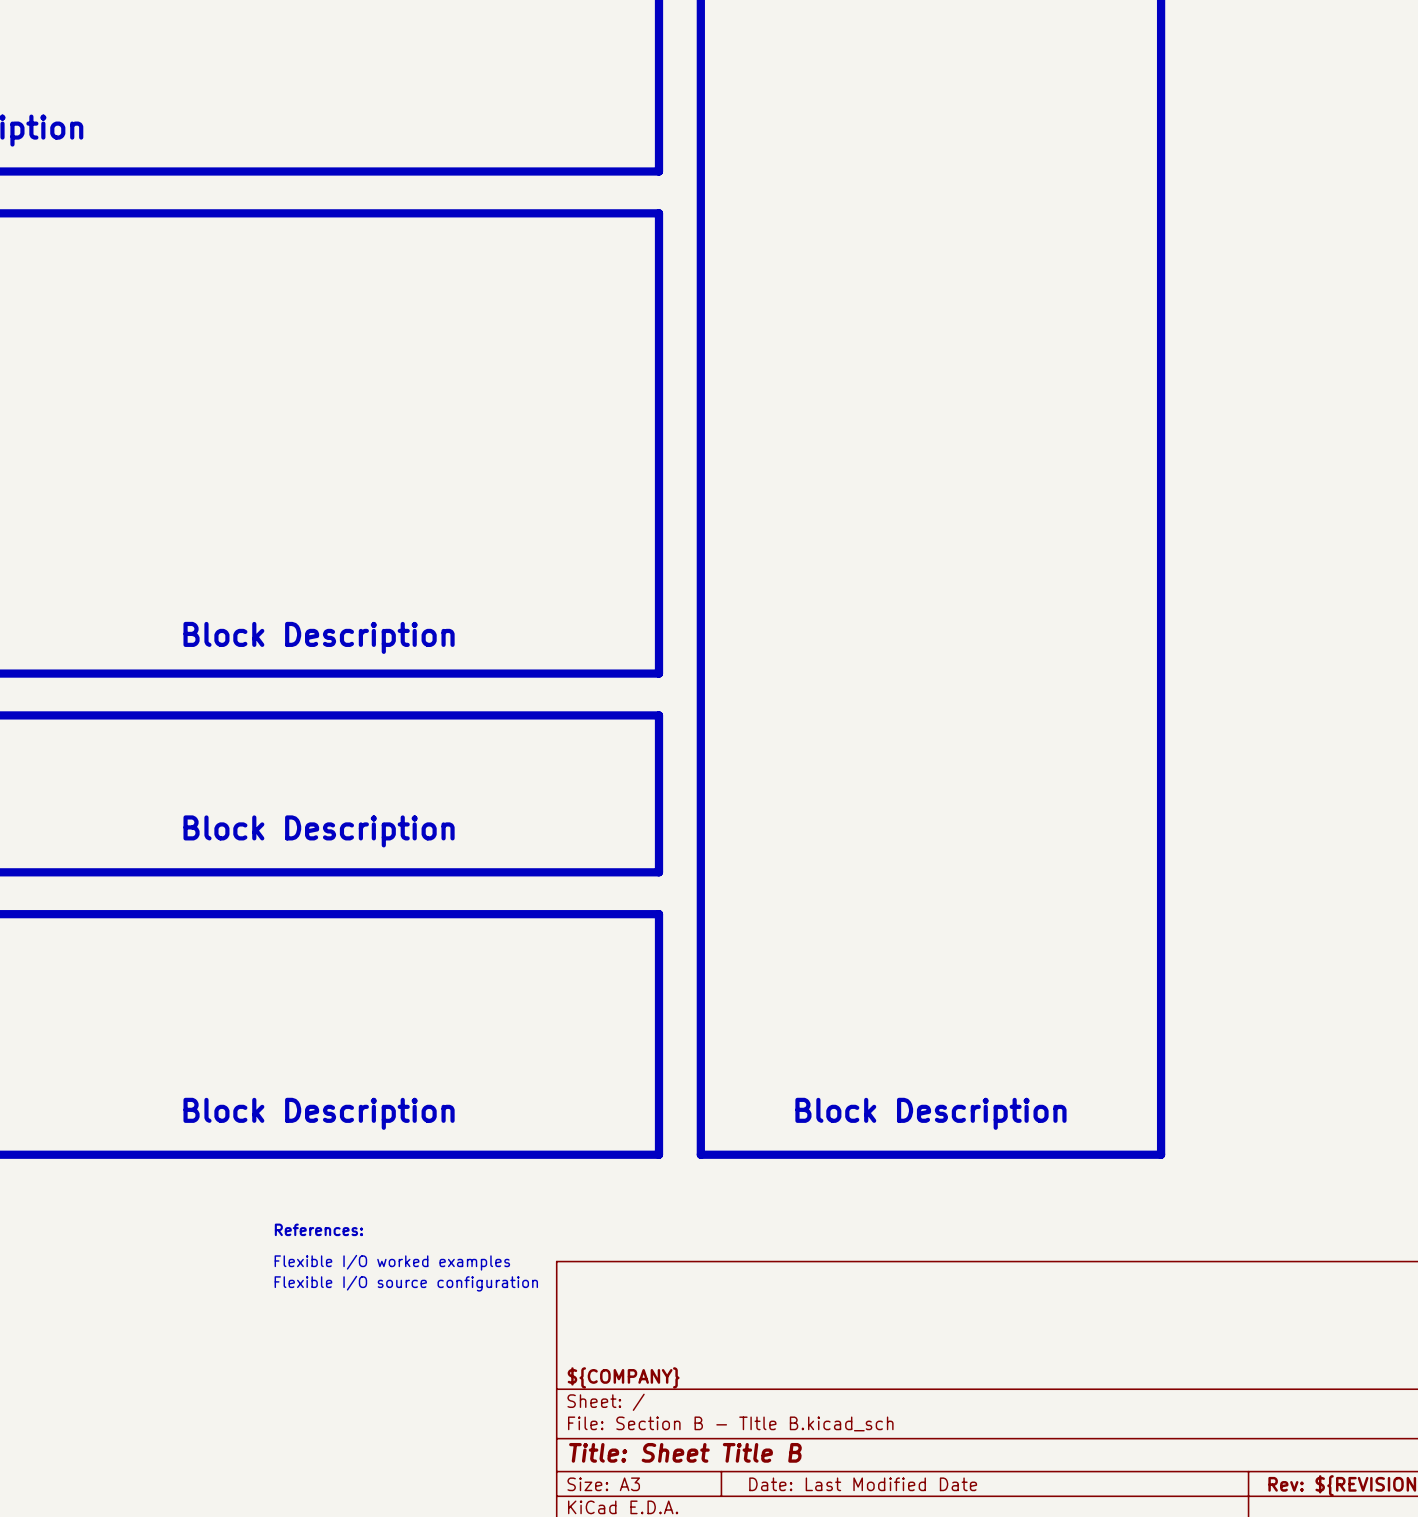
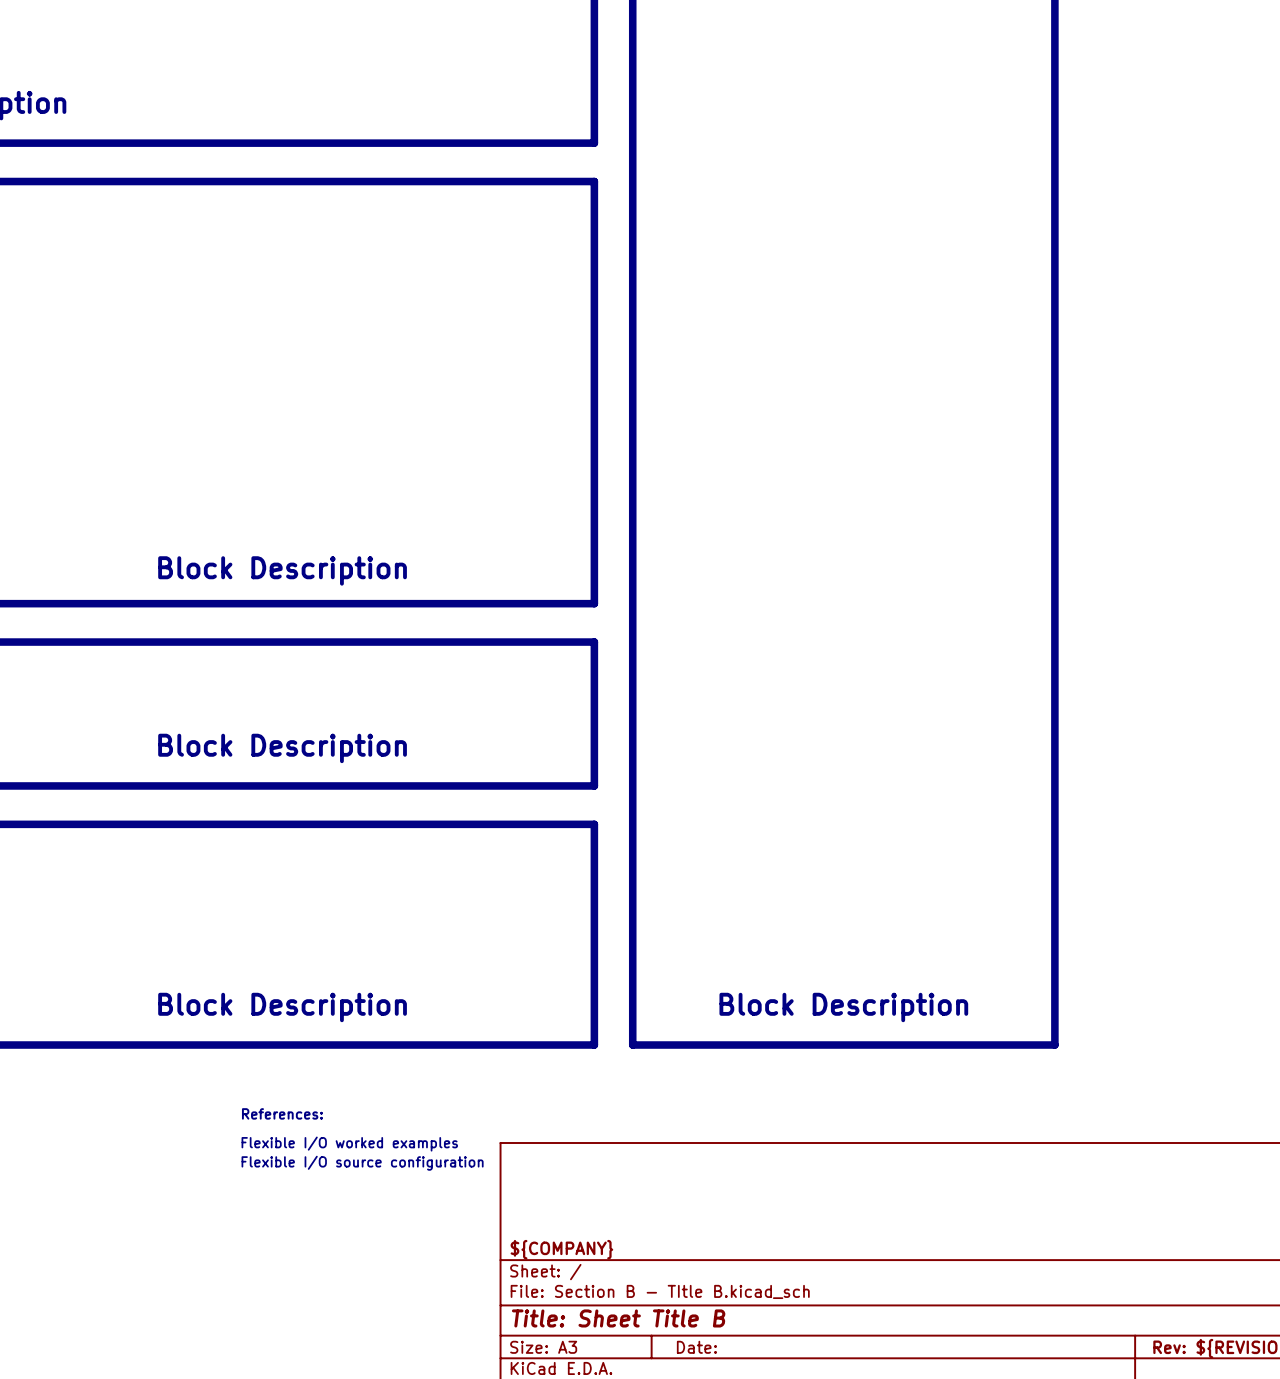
title block: Date: Last Modified Date (863, 1484) -> Date: (696, 1347)

